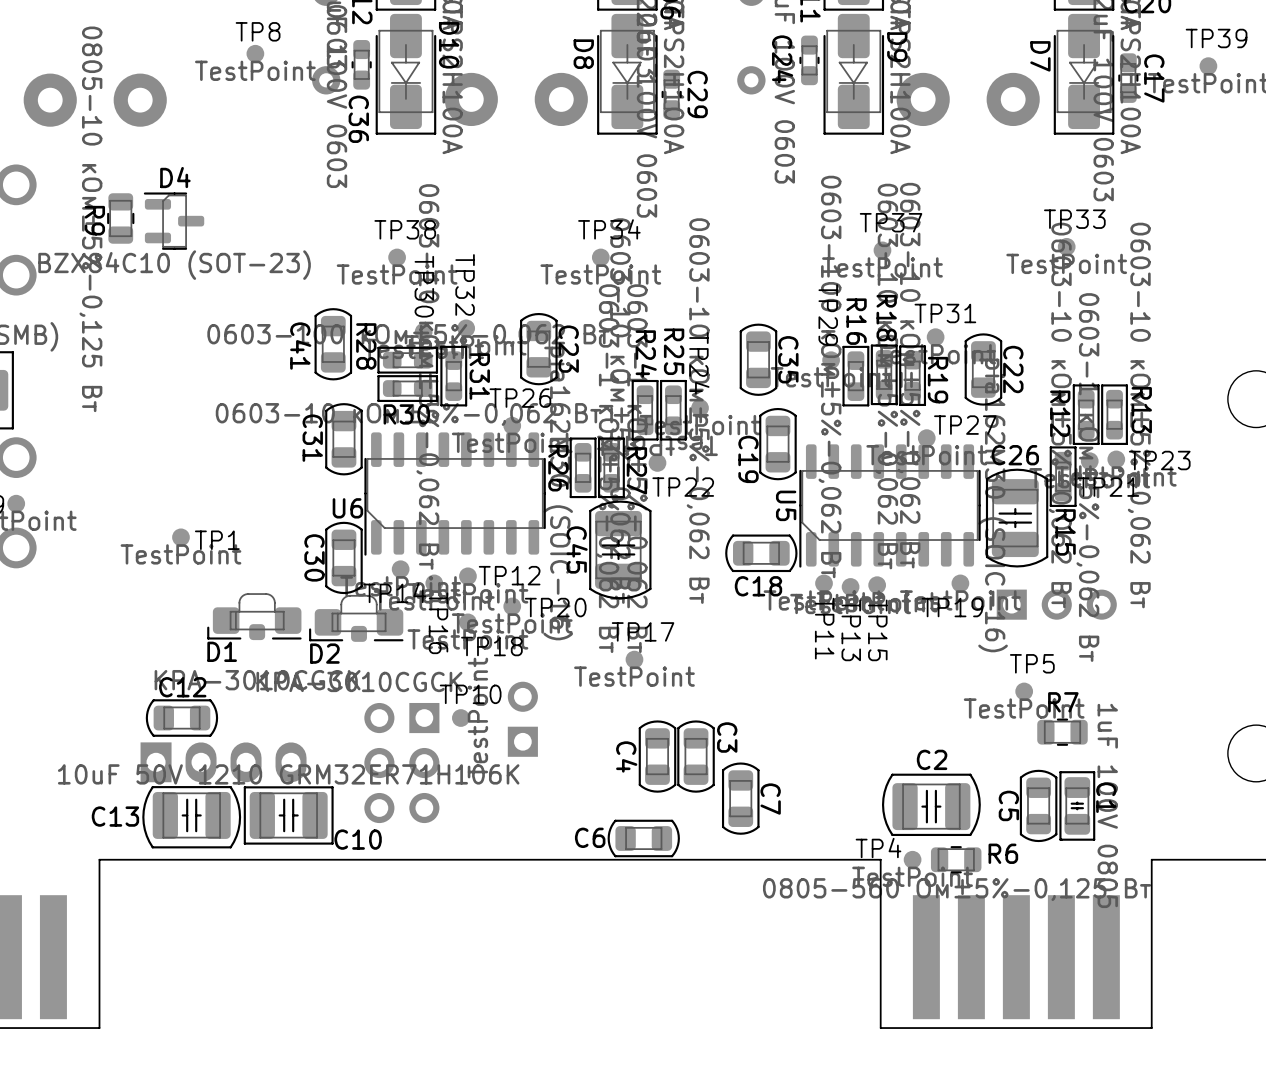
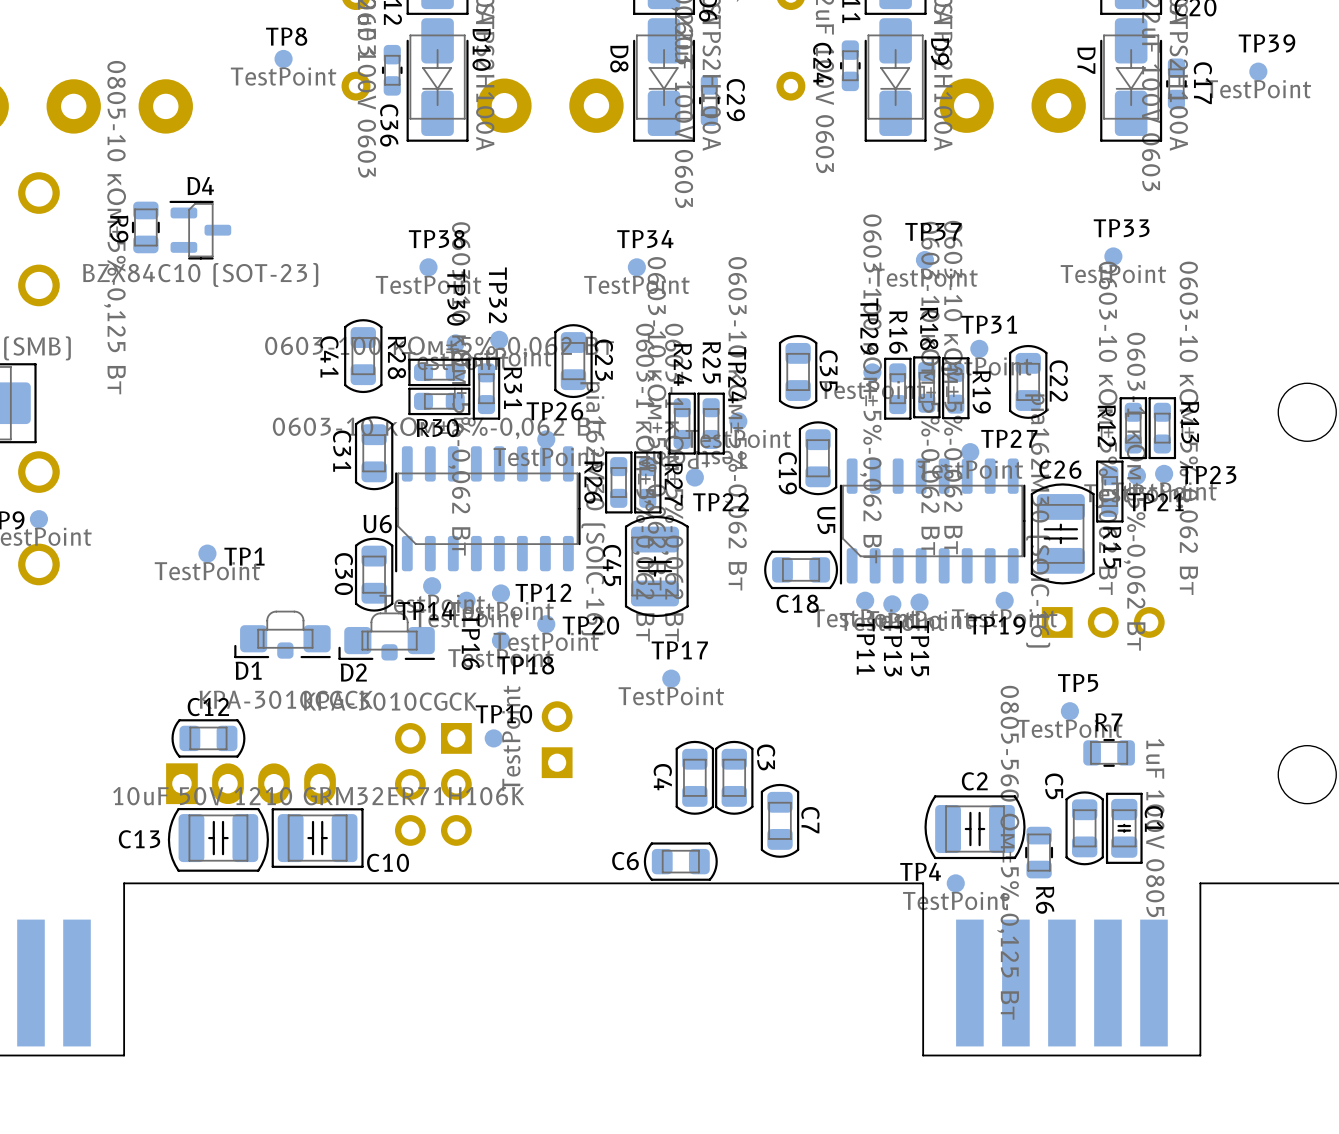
C5 name position: C5 (1008, 805) -> C5 (1054, 786)
R6 rotation: 0° (956, 859) -> 90° clockwise (1039, 852)
R6 position: (956, 859) -> (1039, 852)

